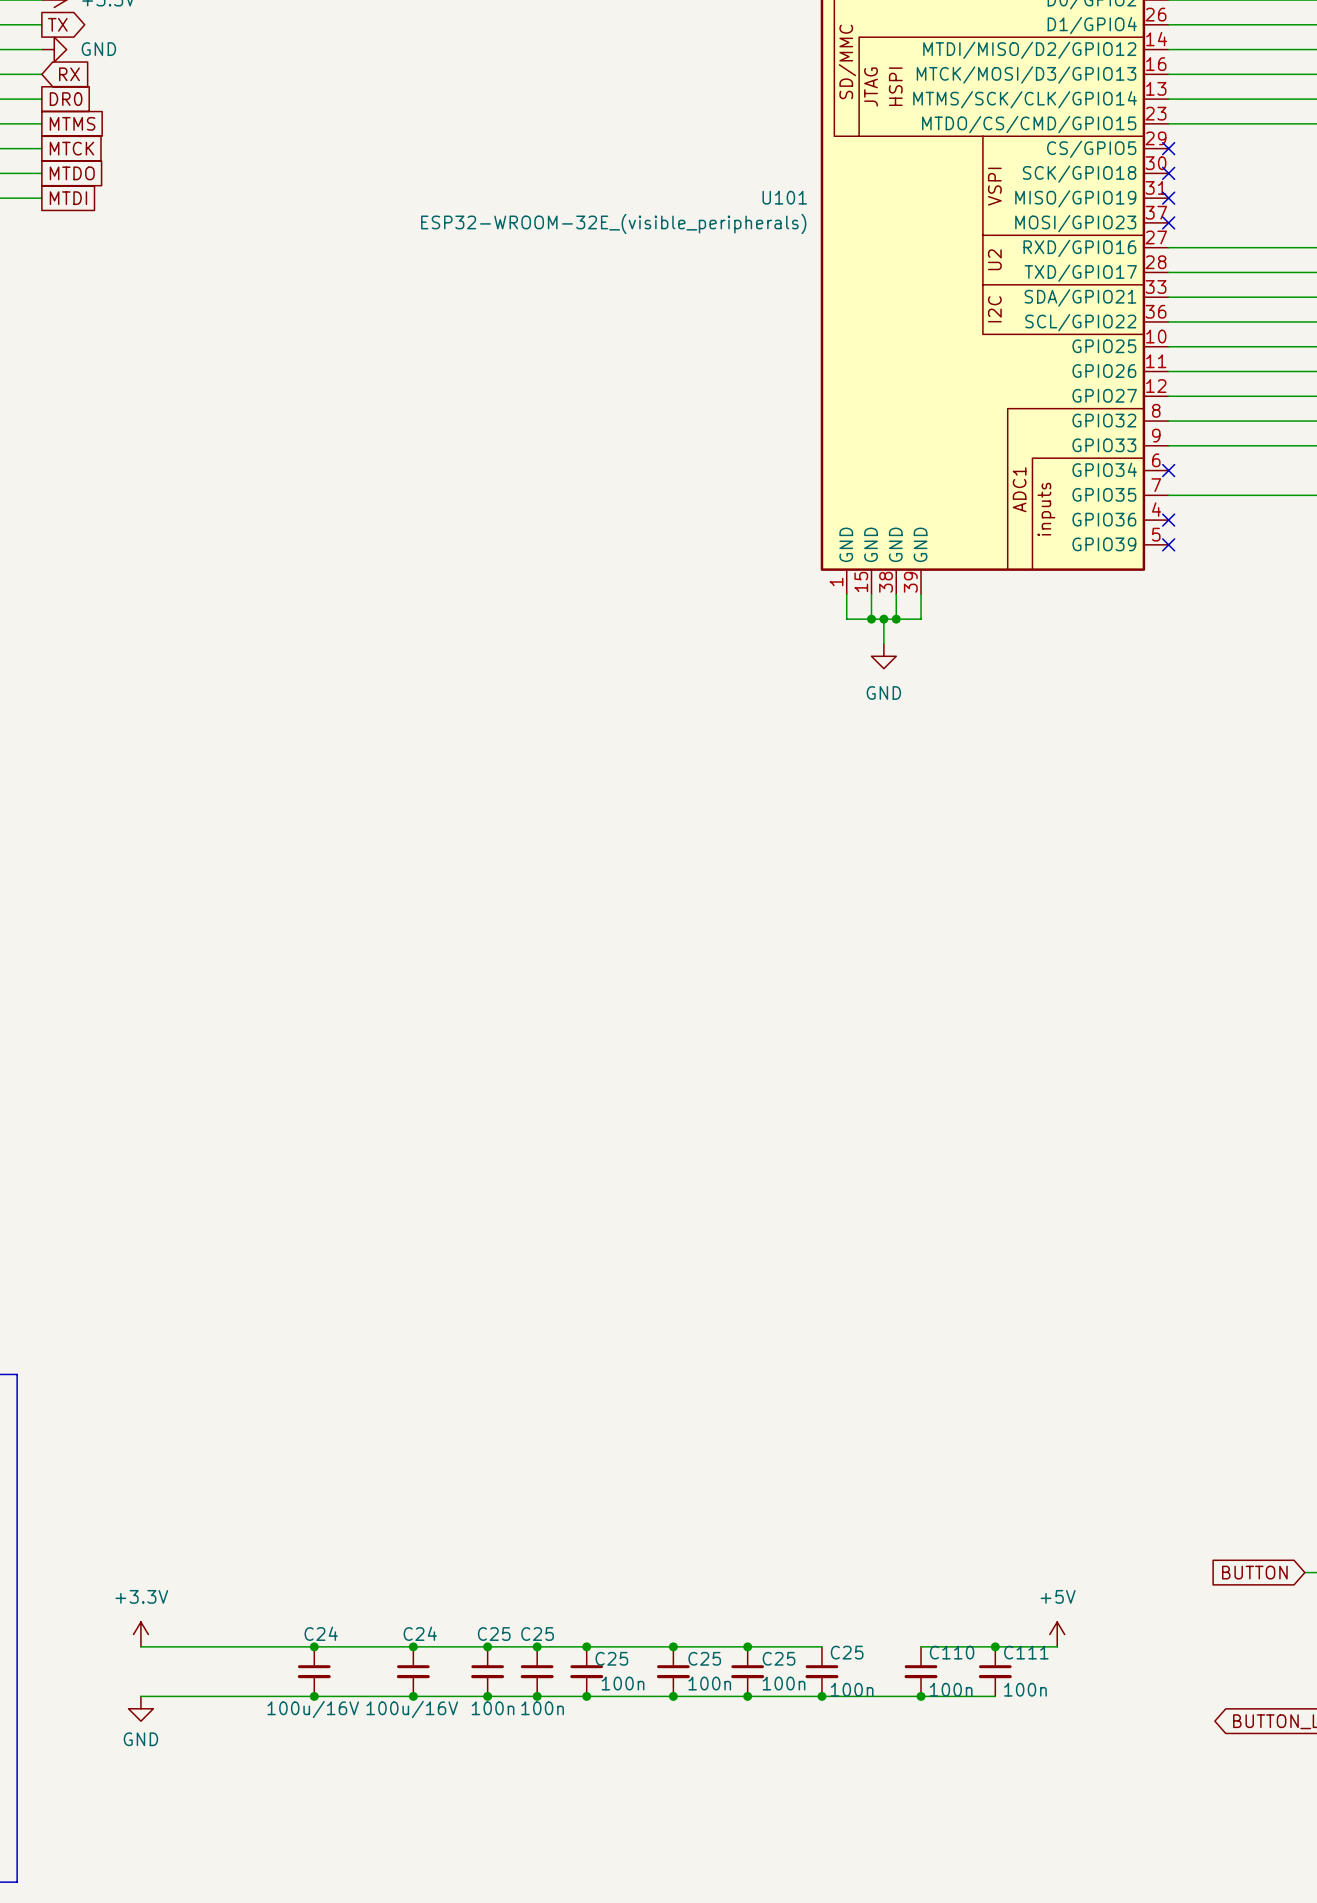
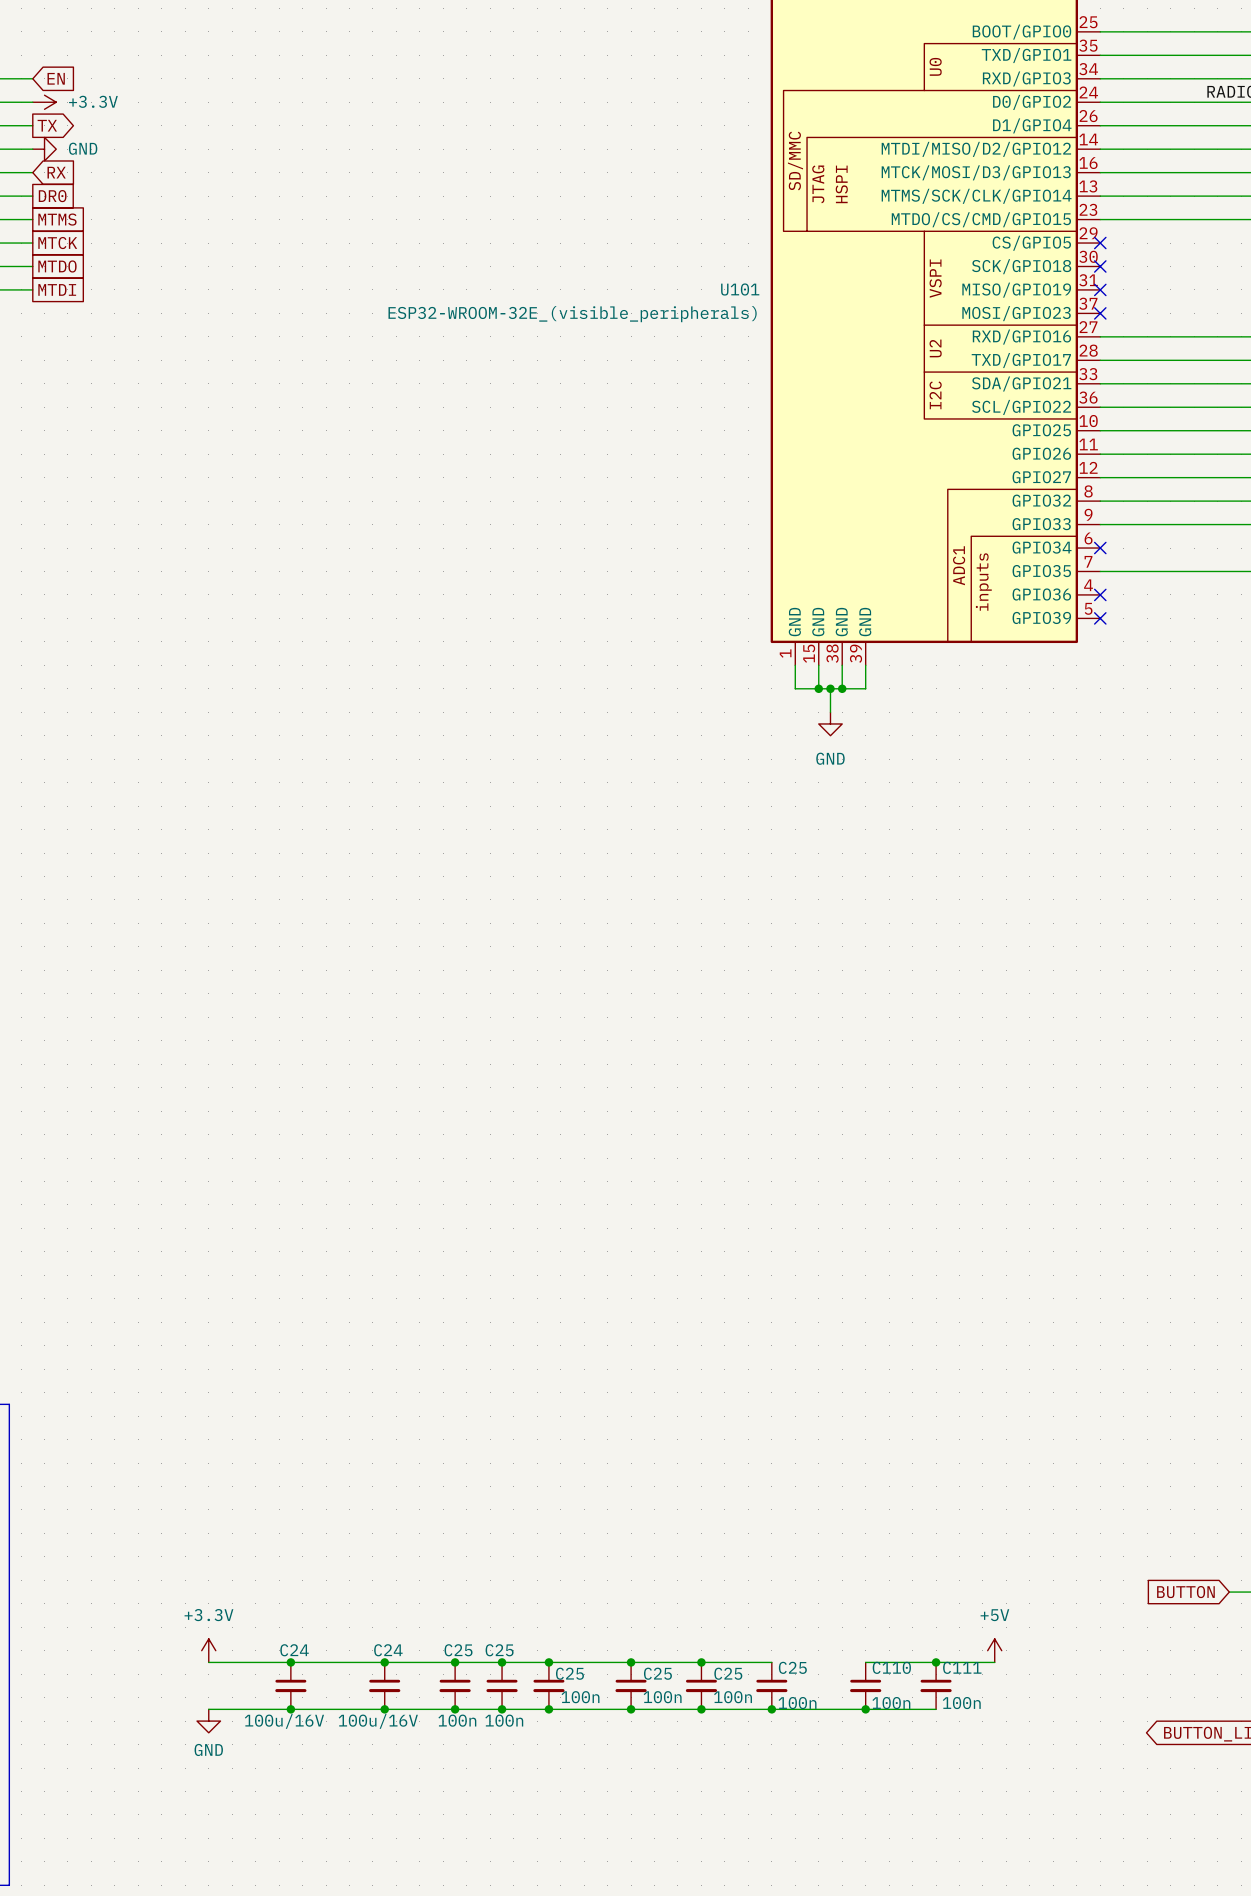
power symbol position: +3.3V (140, 1634) -> +3.3V (208, 1650)
wire: (140, 1646) (227, 1646) -> none
wire: (140, 1696) (227, 1696) -> none
power symbol position: GND (140, 1708) -> GND (208, 1721)

